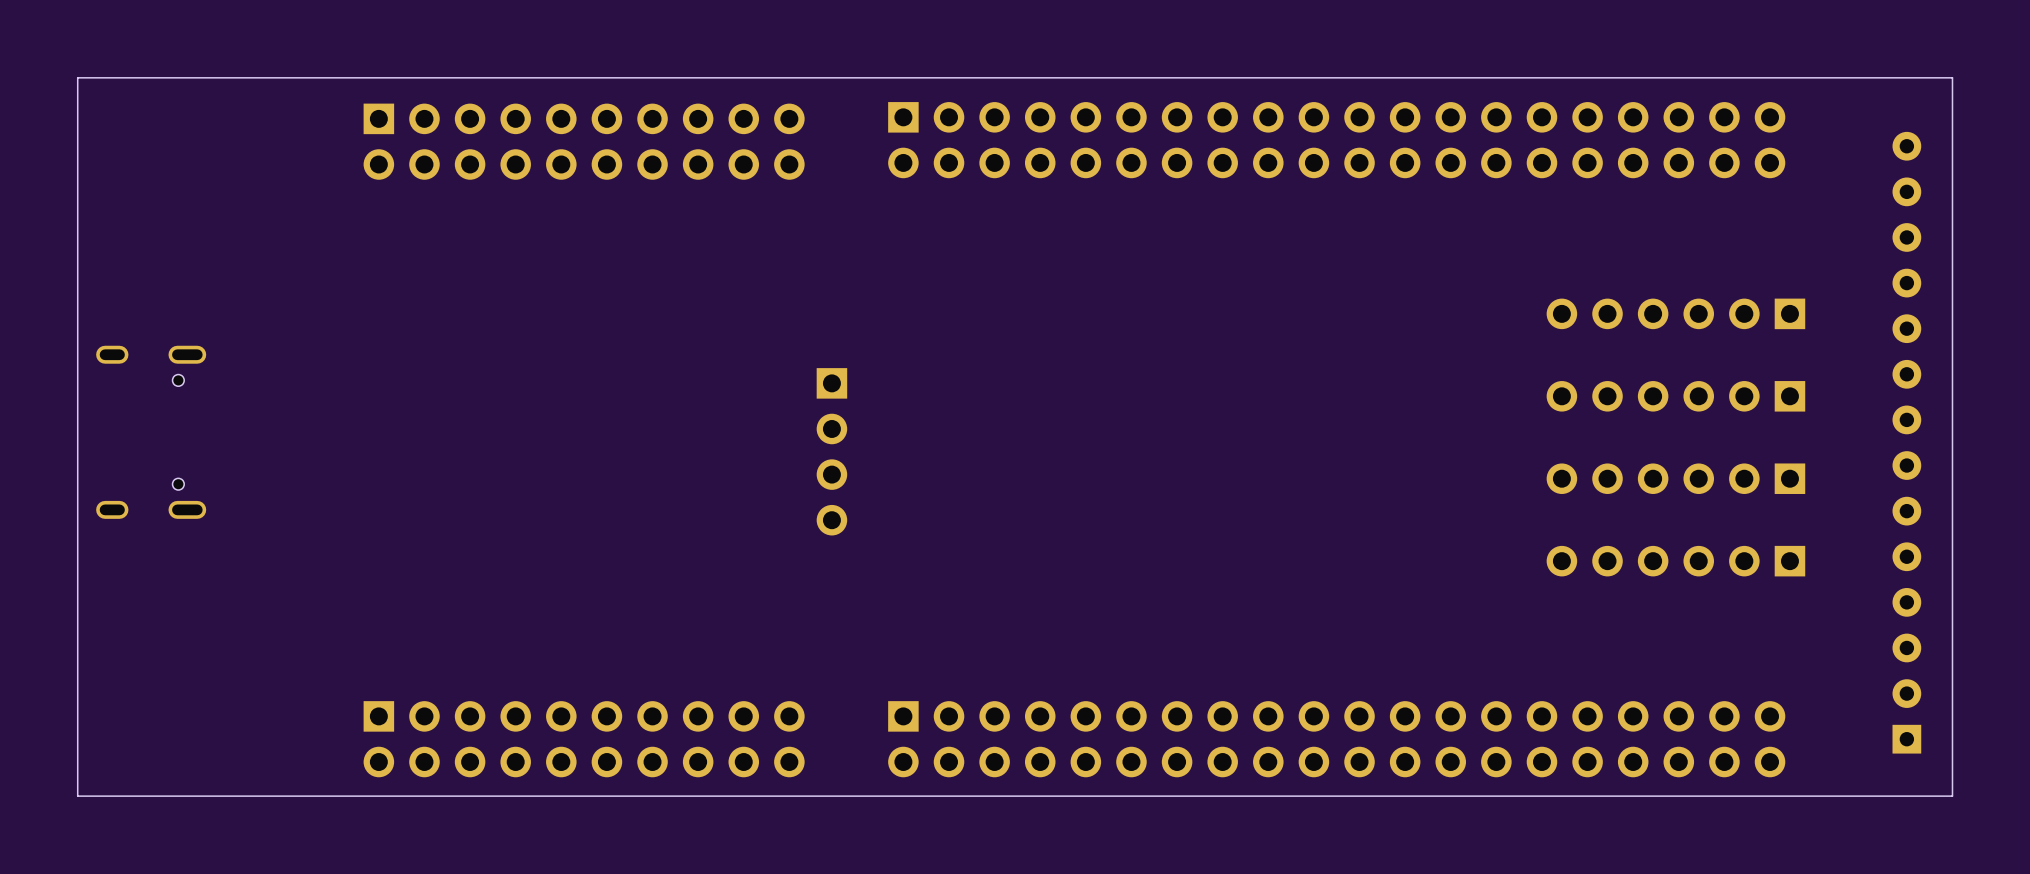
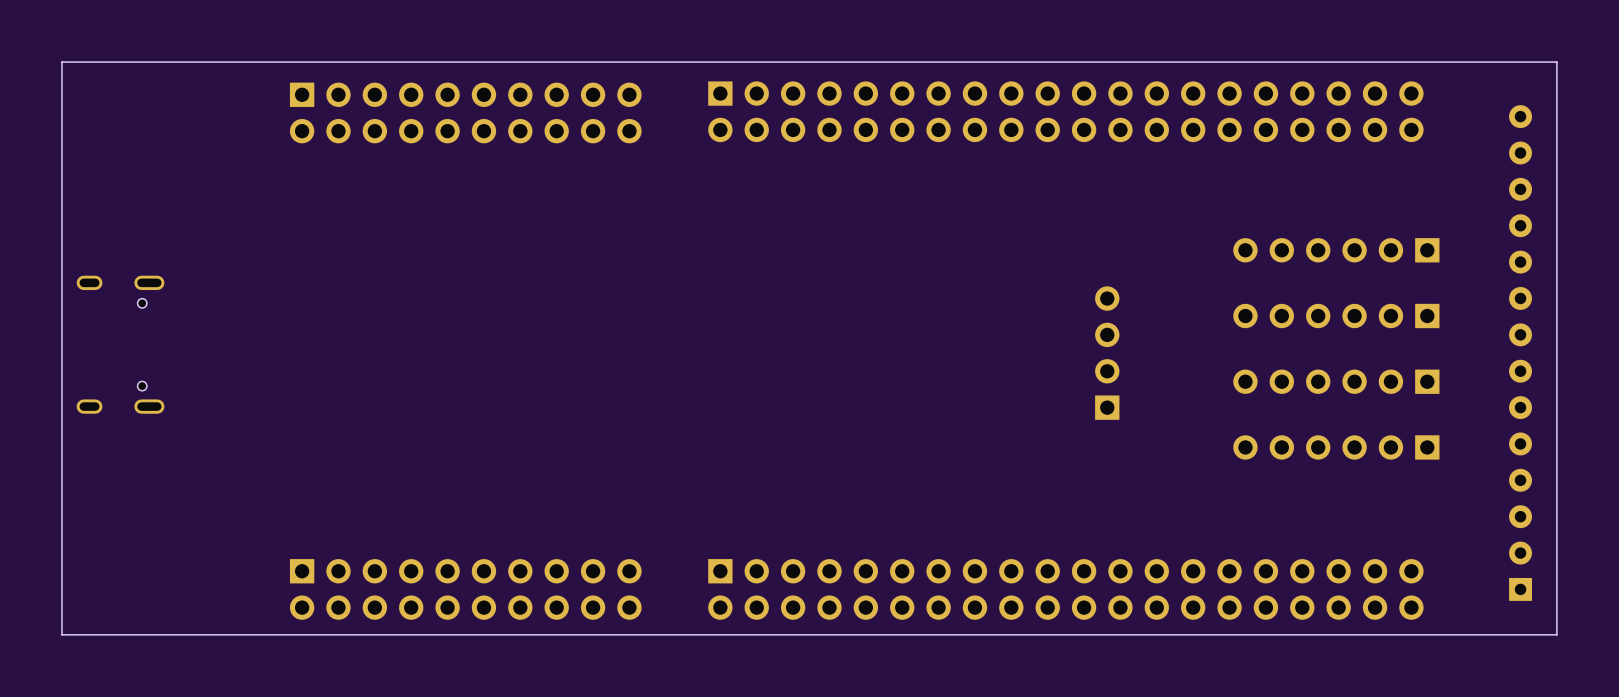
part: none -> (1107, 353)
part: (831, 451) -> none

